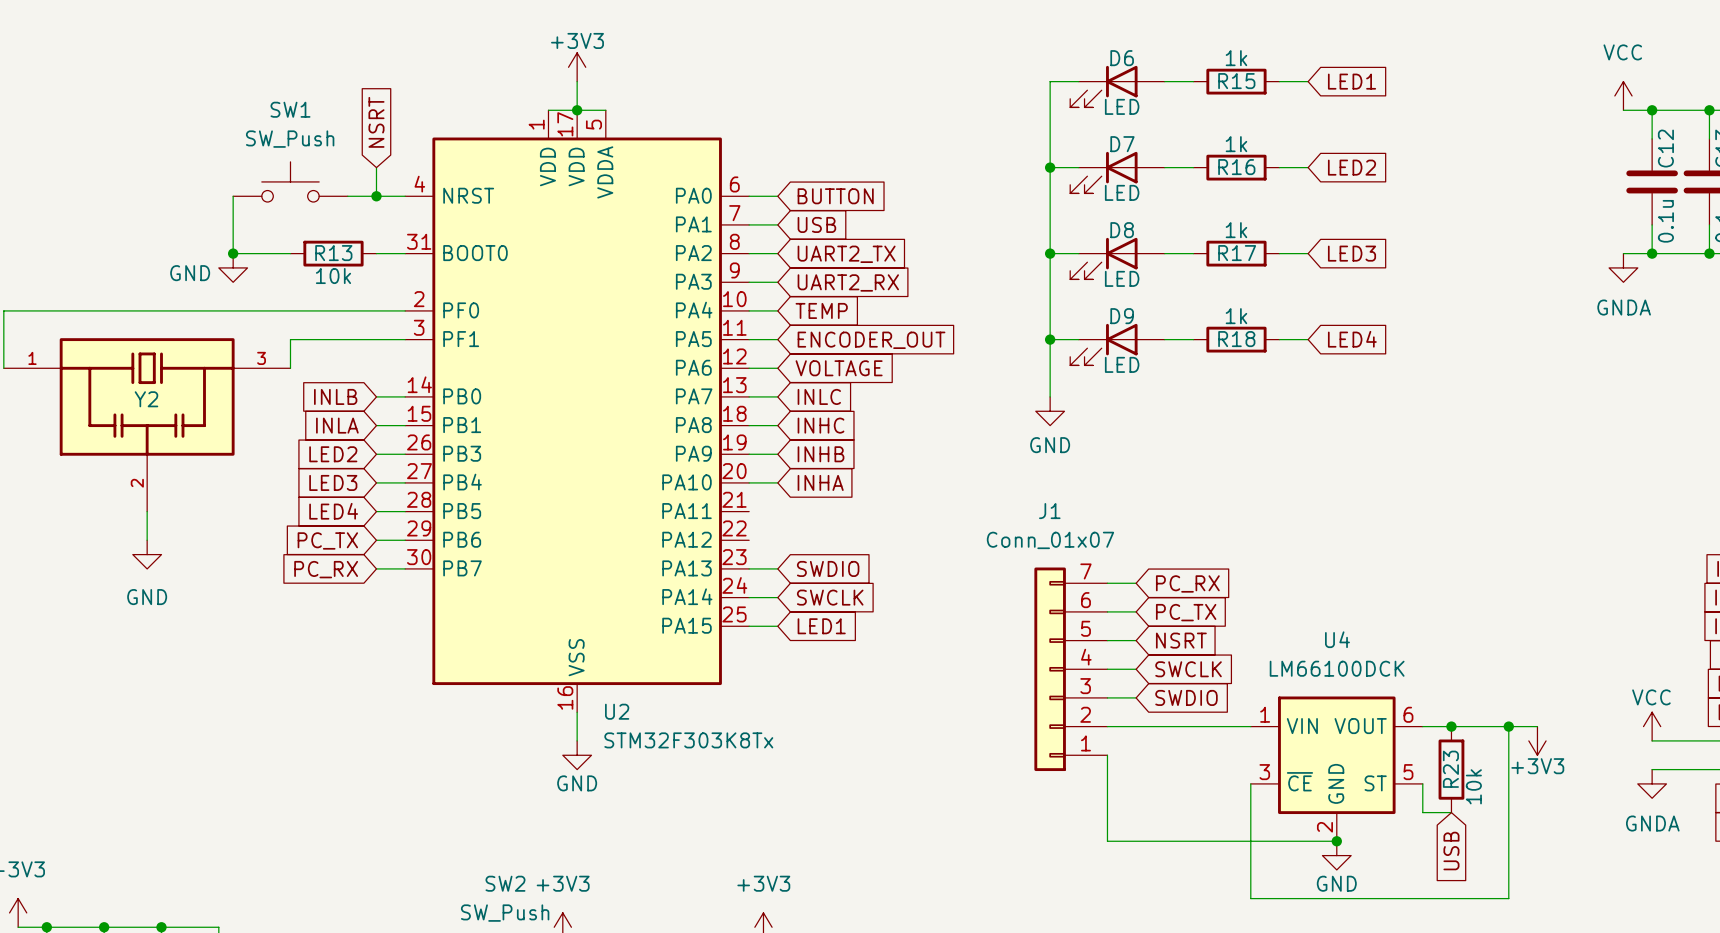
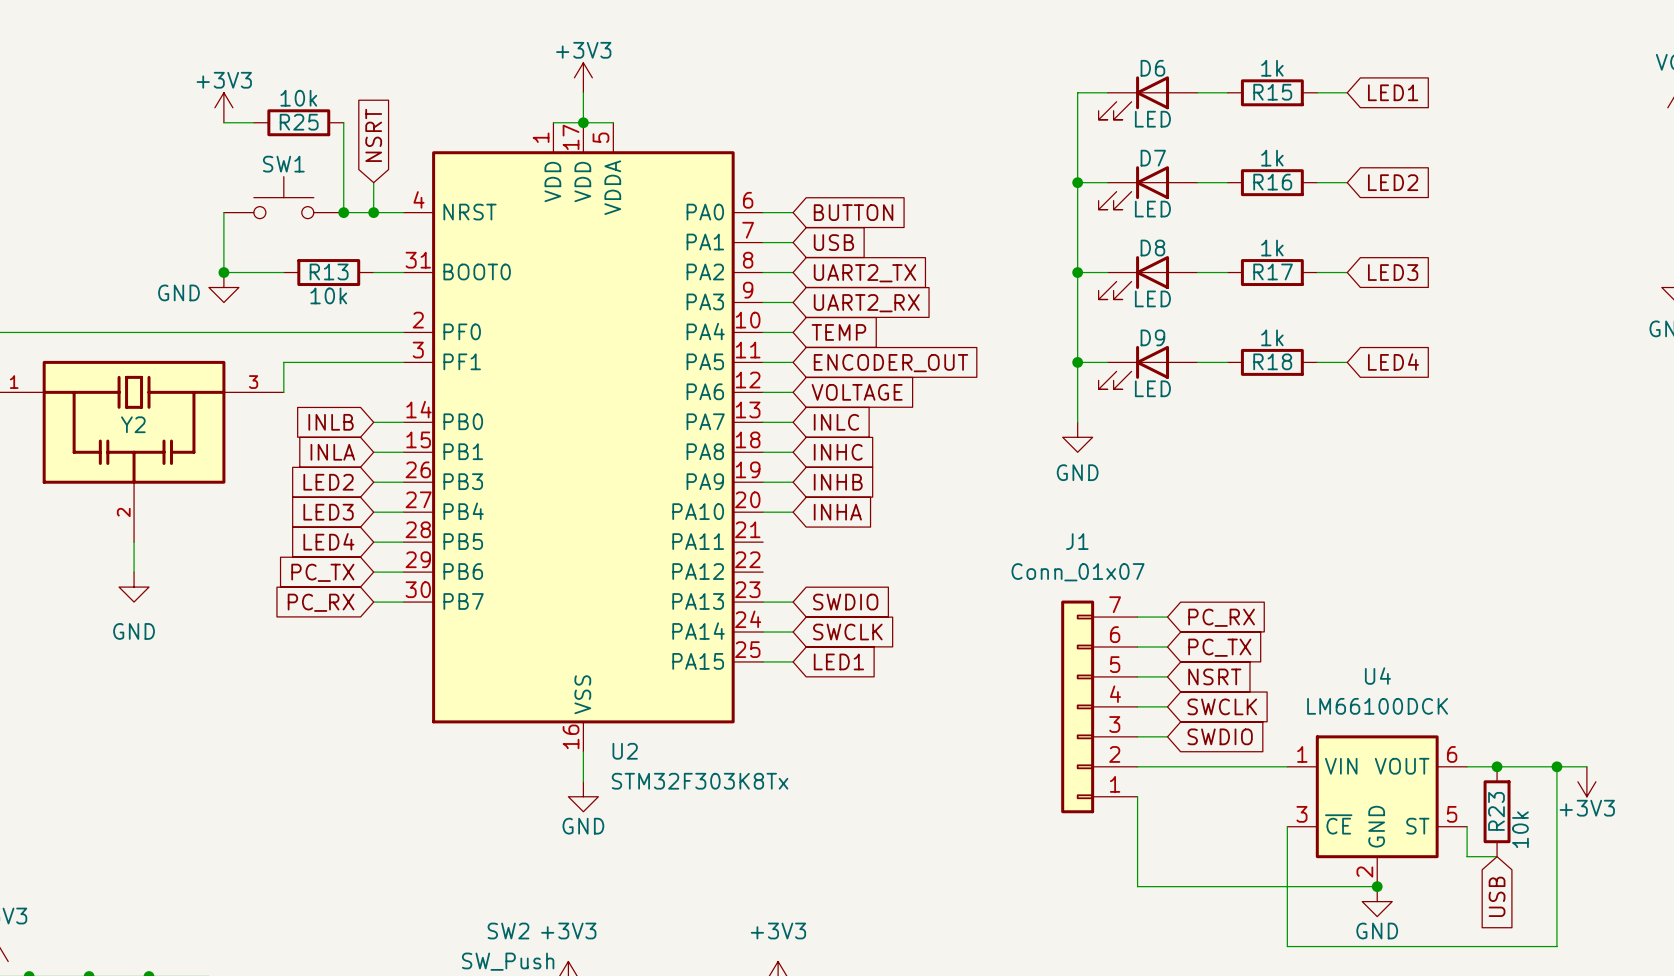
power symbol: none -> +3V3 (223, 107)
SW1 name position: SW1 (290, 109) -> SW1 (283, 164)
wire: none -> (223, 122) (253, 122)
R25: none -> 10k (298, 122)
wire: none -> (343, 122) (343, 212)
SW1 value: SW_Push (290, 139) -> none
junction: none -> (343, 212)

